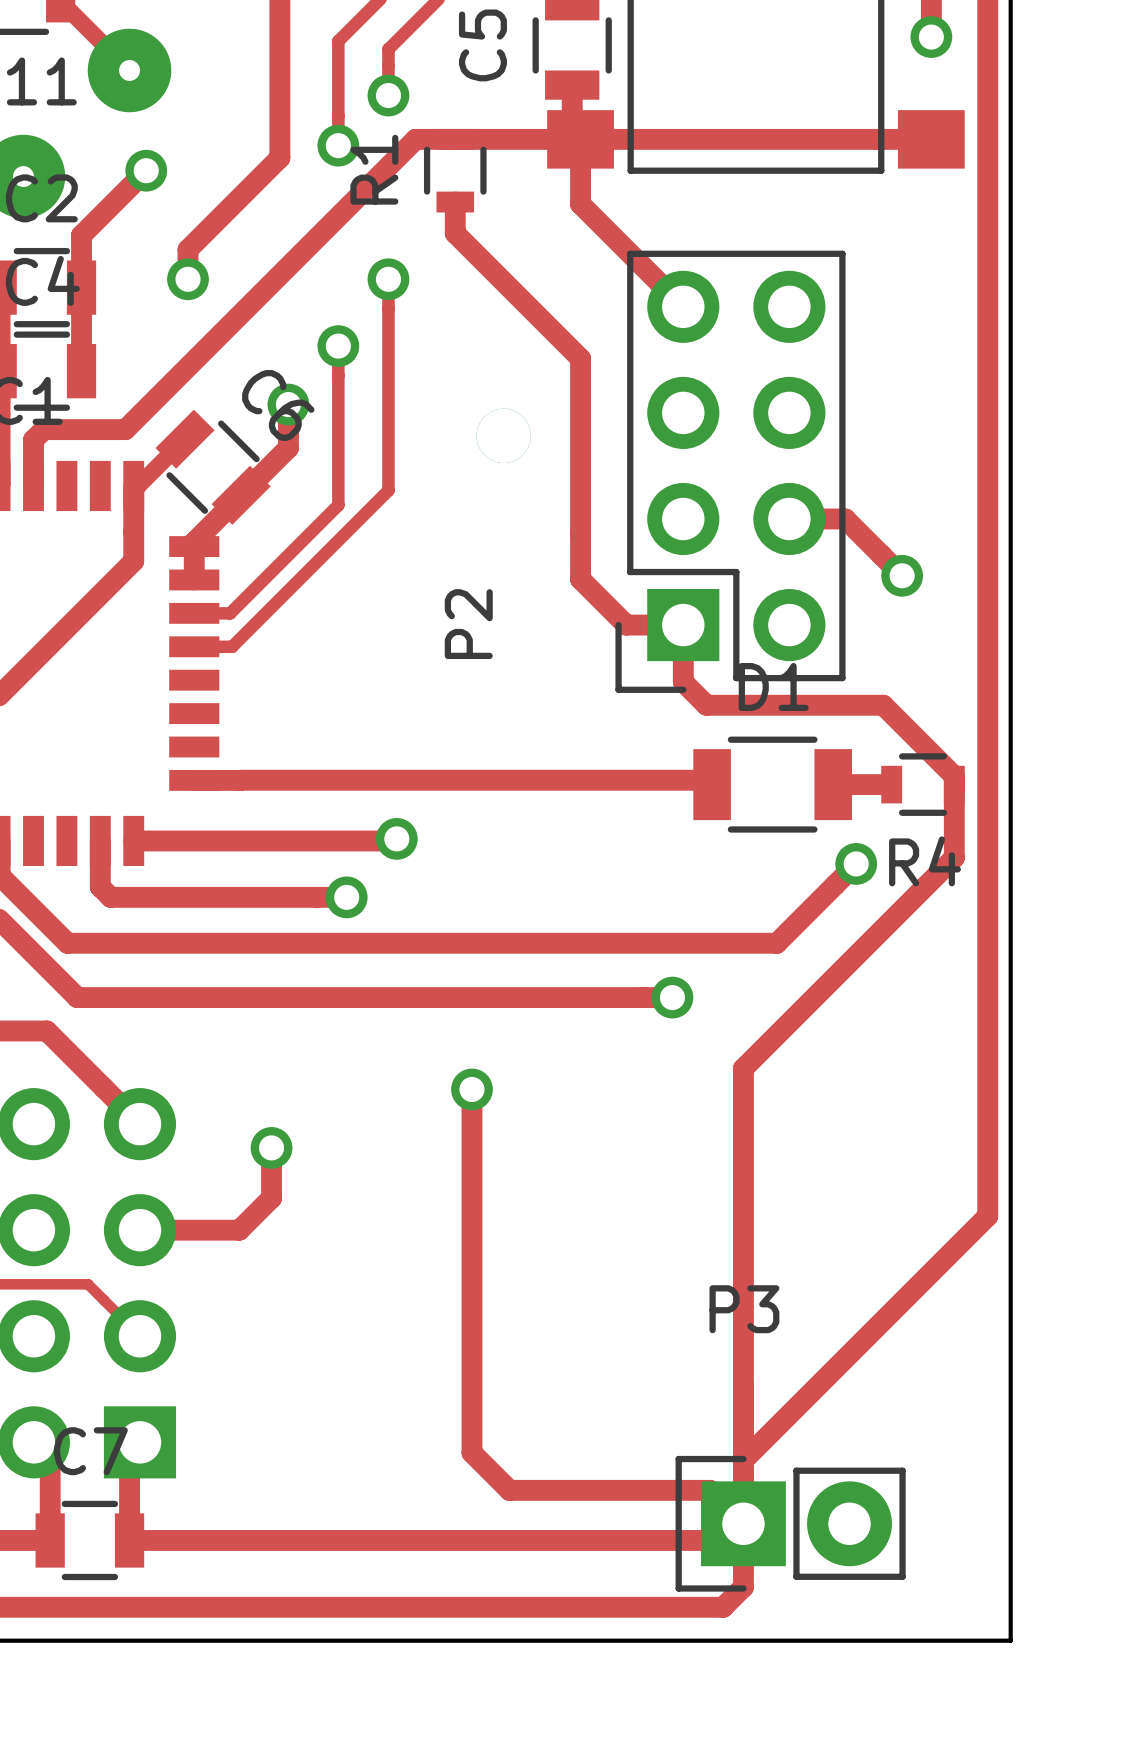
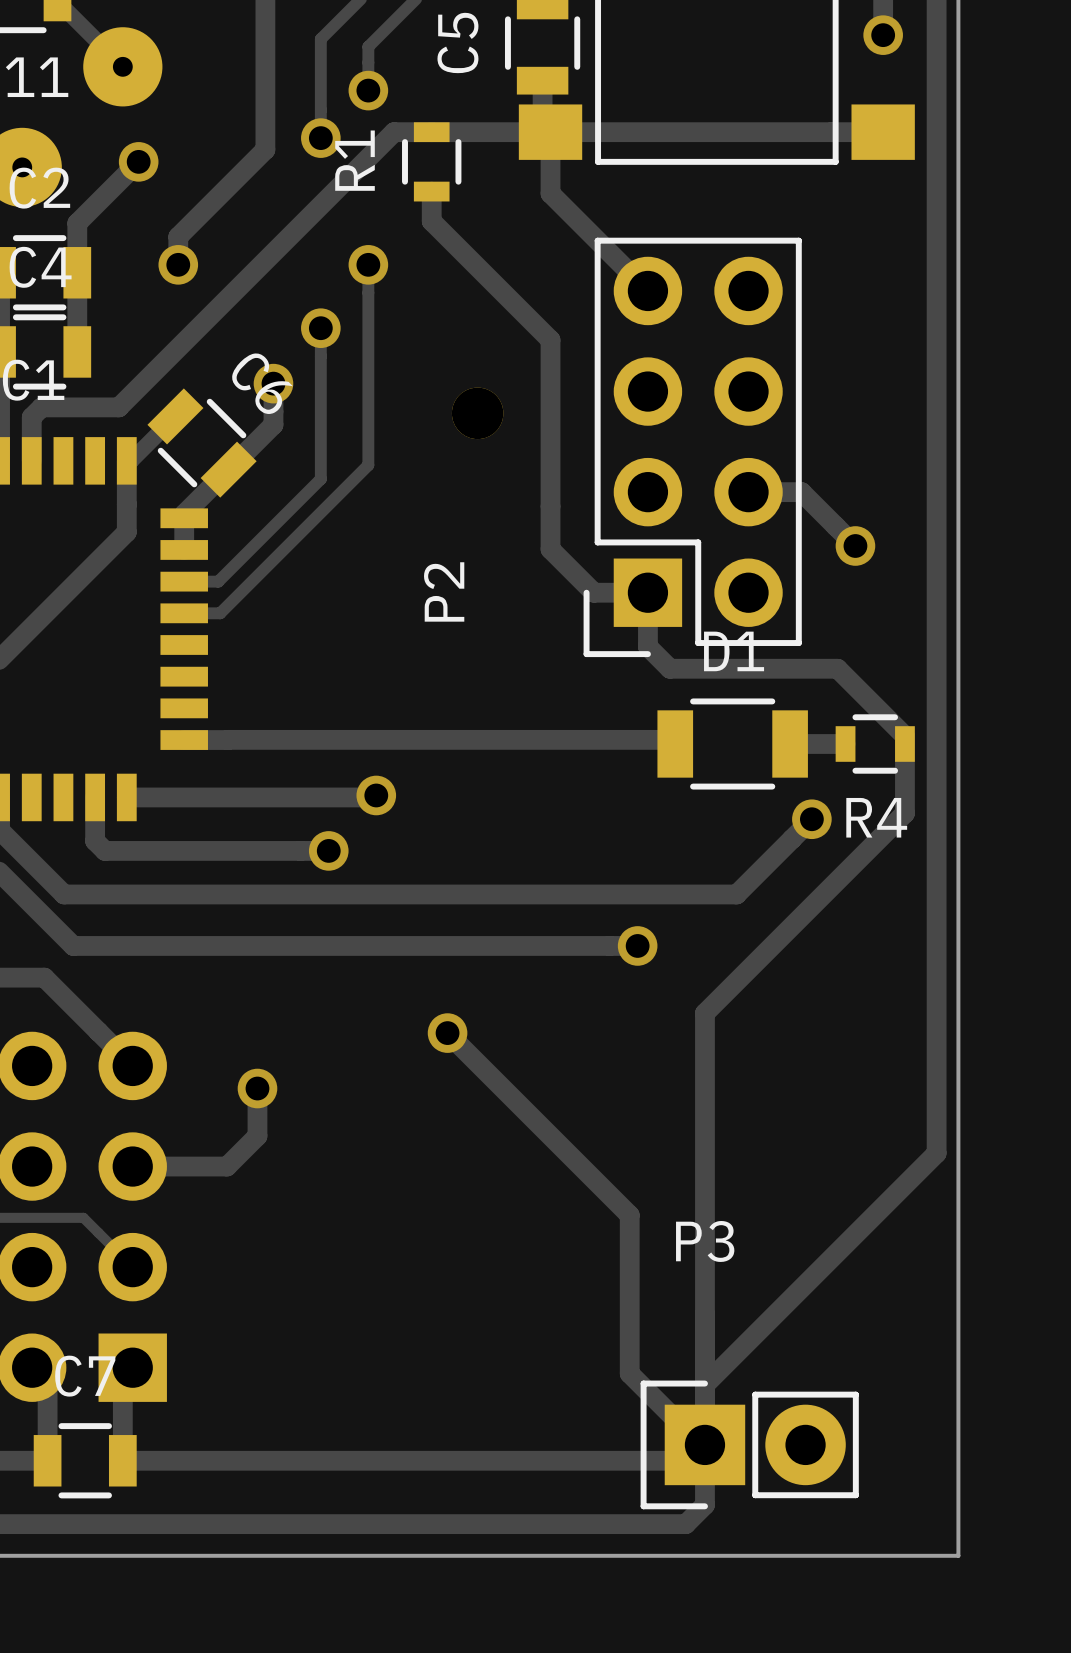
track: (471, 1089) (471, 1452) (509, 1490) (710, 1490) (743, 1523) -> (447, 1033) (629, 1215) (629, 1373) (701, 1444) (704, 1444)

